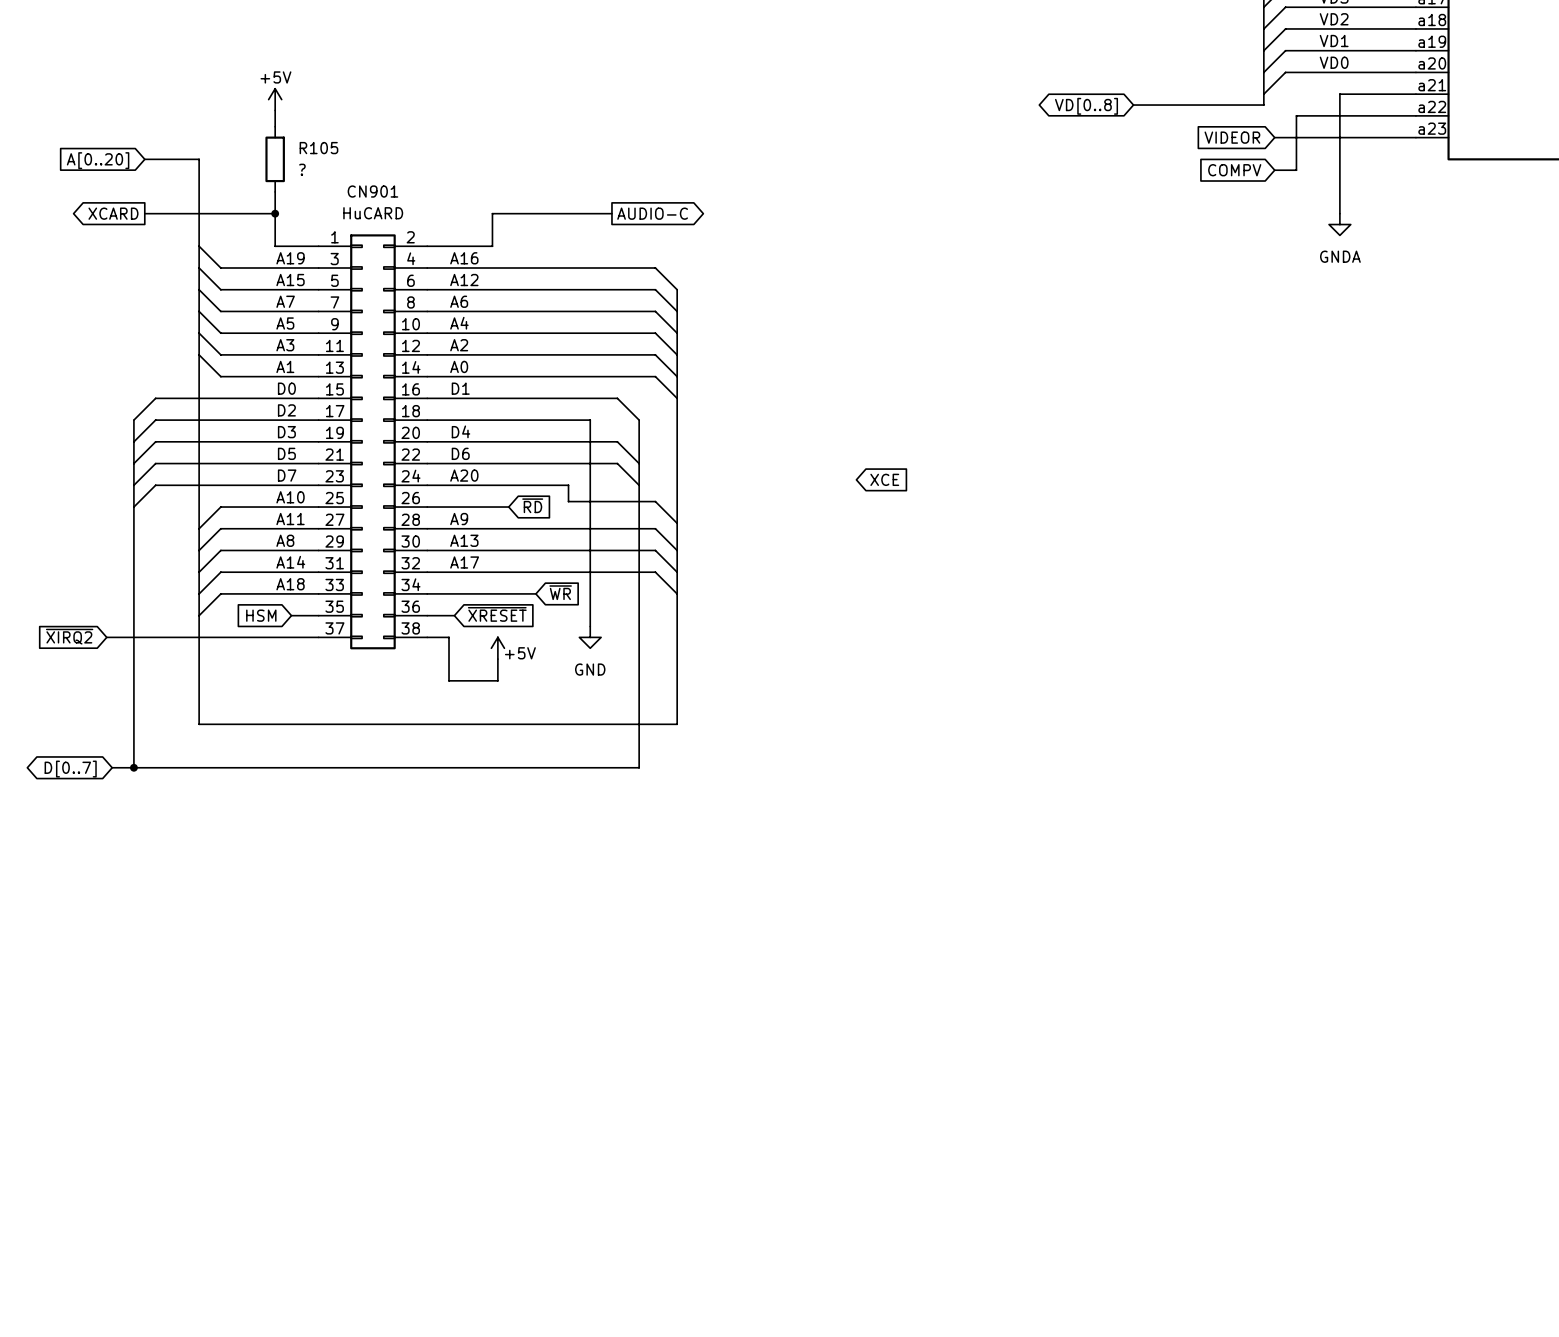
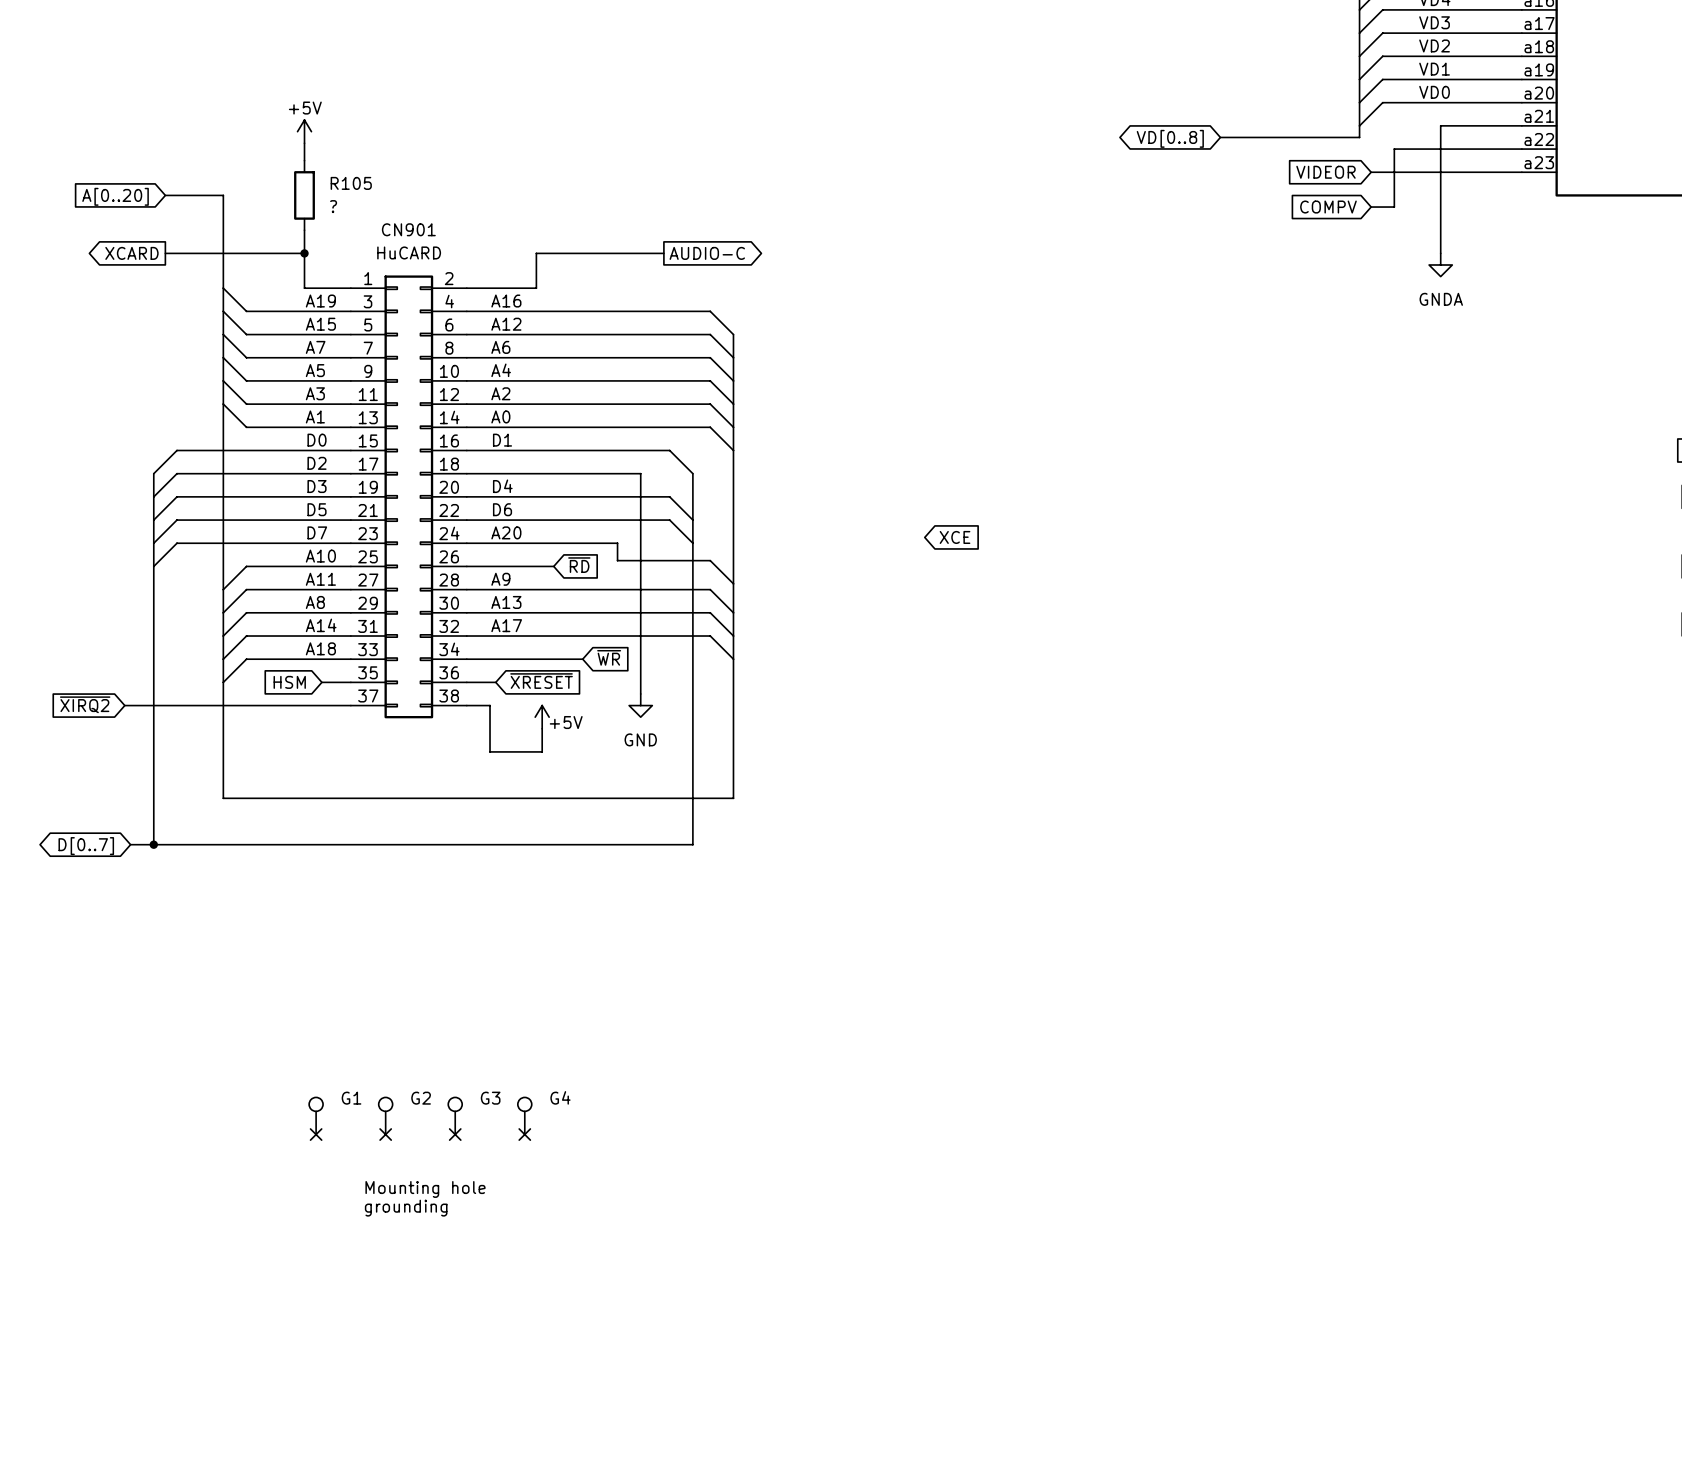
G1: none -> (316, 1115)
G2: none -> (385, 1115)
G3: none -> (455, 1115)
G4: none -> (524, 1115)
no-connect mark: none -> (316, 1134)
no-connect mark: none -> (385, 1134)
no-connect mark: none -> (455, 1134)
no-connect mark: none -> (524, 1134)
text: none -> Mounting hole (425, 1189)
text: none -> grounding (406, 1208)

